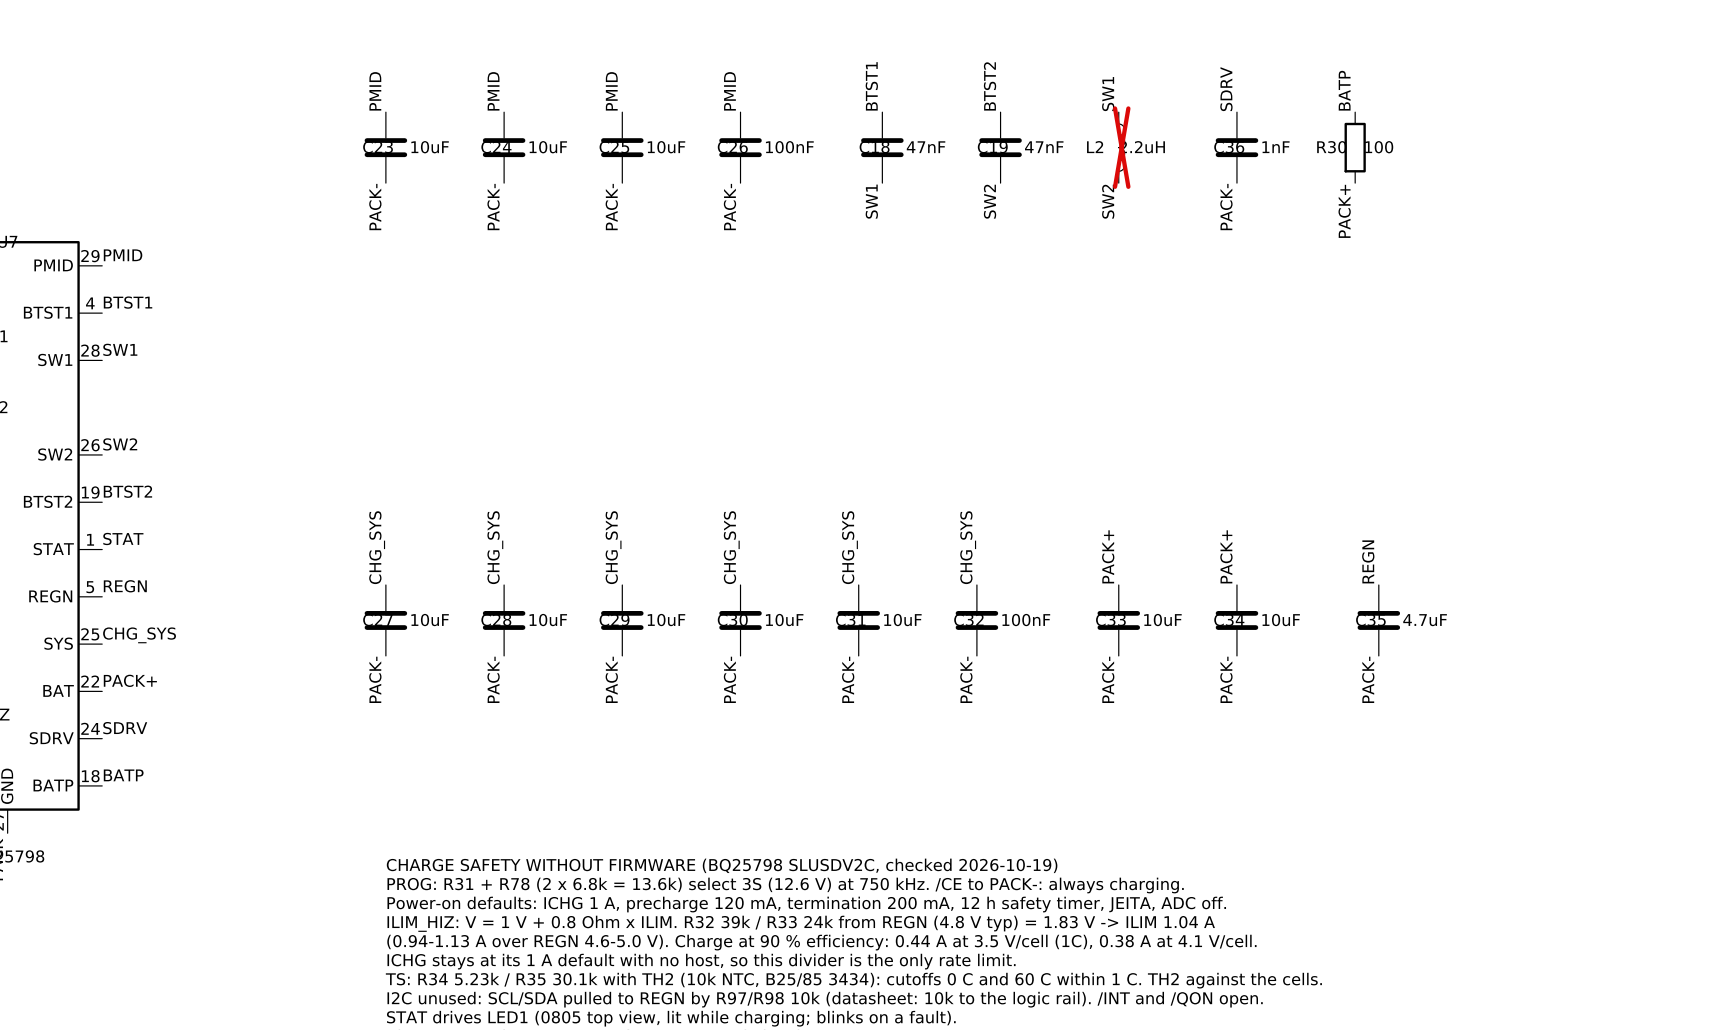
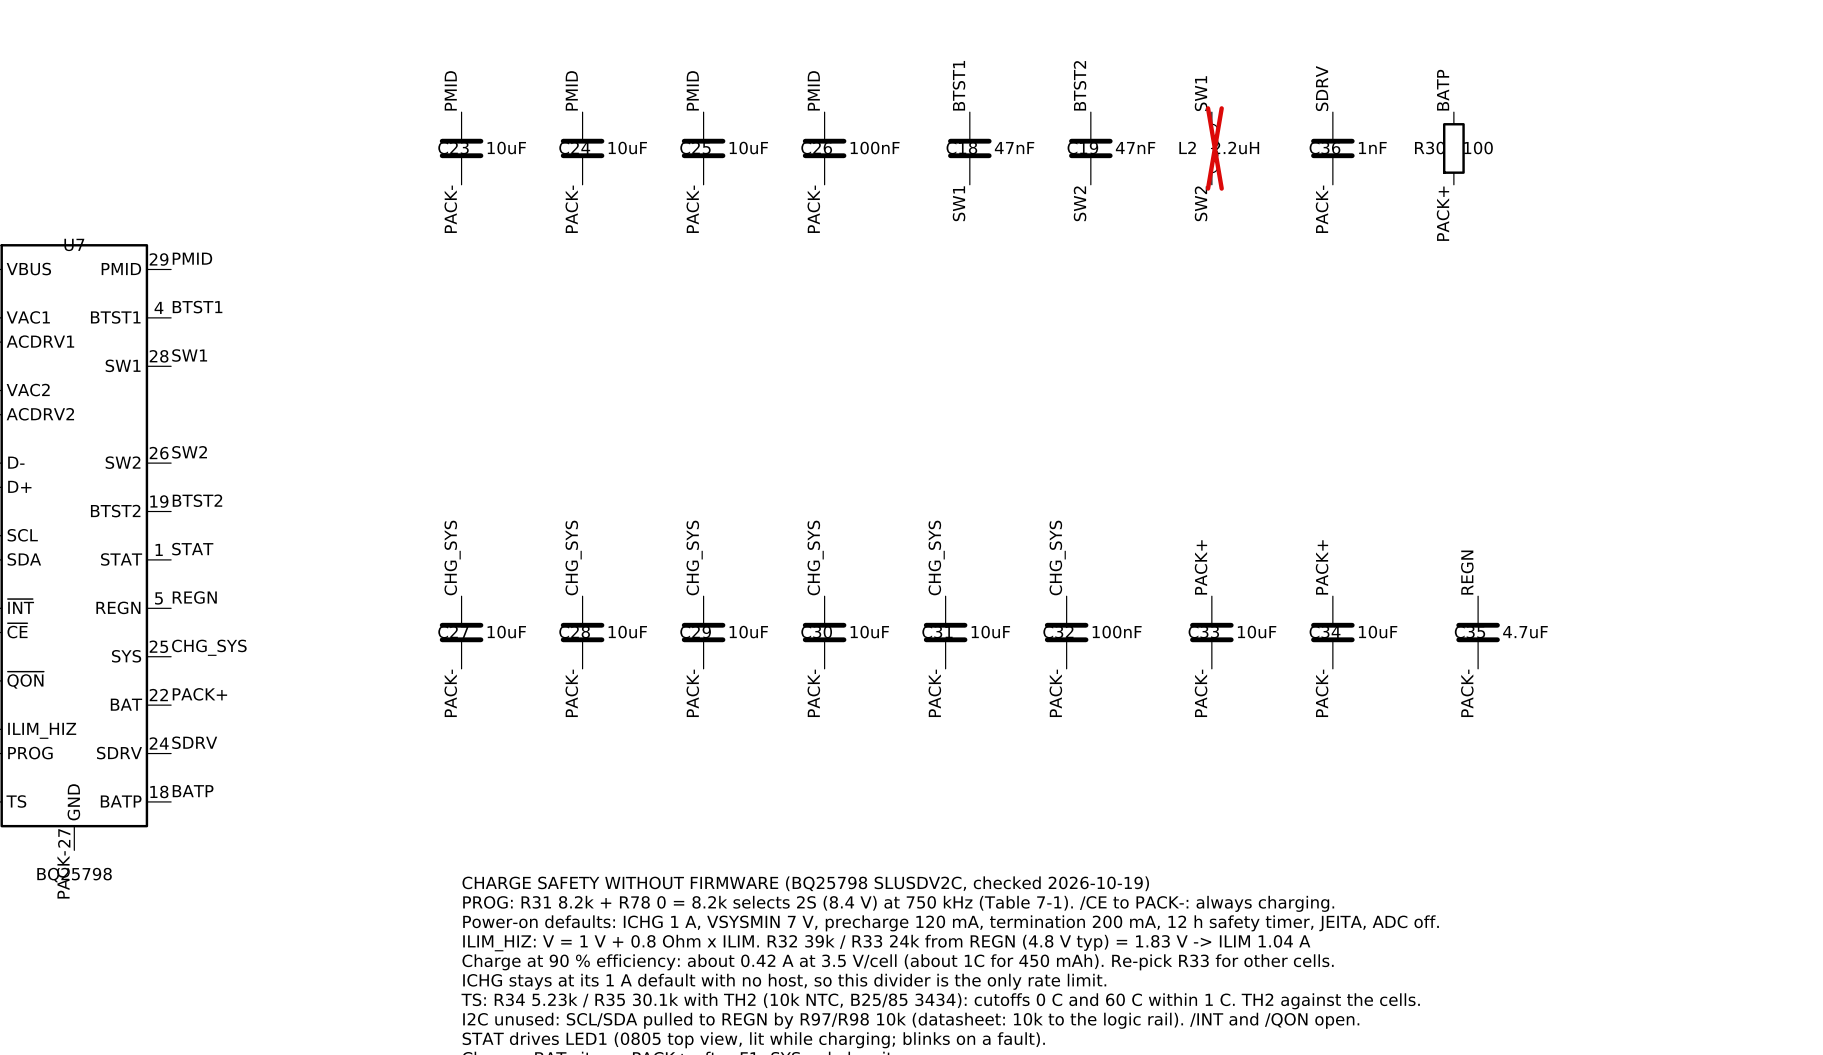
text: PROG: R31 + R78 (2 x 6.8k = 13.6k) select 3S (12.6 V) at 750 kHz. /CE to PACK-: always charging. (785, 885) -> PROG: R31 8.2k + R78 0 = 8.2k selects 2S (8.4 V) at 750 kHz (Table 7-1). /CE to PACK-: always charging. (898, 903)
text: Power-on defaults: ICHG 1 A, precharge 120 mA, termination 200 mA, 12 h safety timer, JEITA, ADC off. (806, 904) -> Power-on defaults: ICHG 1 A, VSYSMIN 7 V, precharge 120 mA, termination 200 mA, 12 h safety timer, JEITA, ADC off. (951, 923)
text: (0.94-1.13 A over REGN 4.6-5.0 V). Charge at 90 % efficiency: 0.44 A at 3.5 V/cell (1C), 0.38 A at 4.1 V/cell. (821, 942) -> Charge at 90 % efficiency: about 0.42 A at 3.5 V/cell (about 1C for 450 mAh). Re-pick R33 for other cells. (898, 962)

